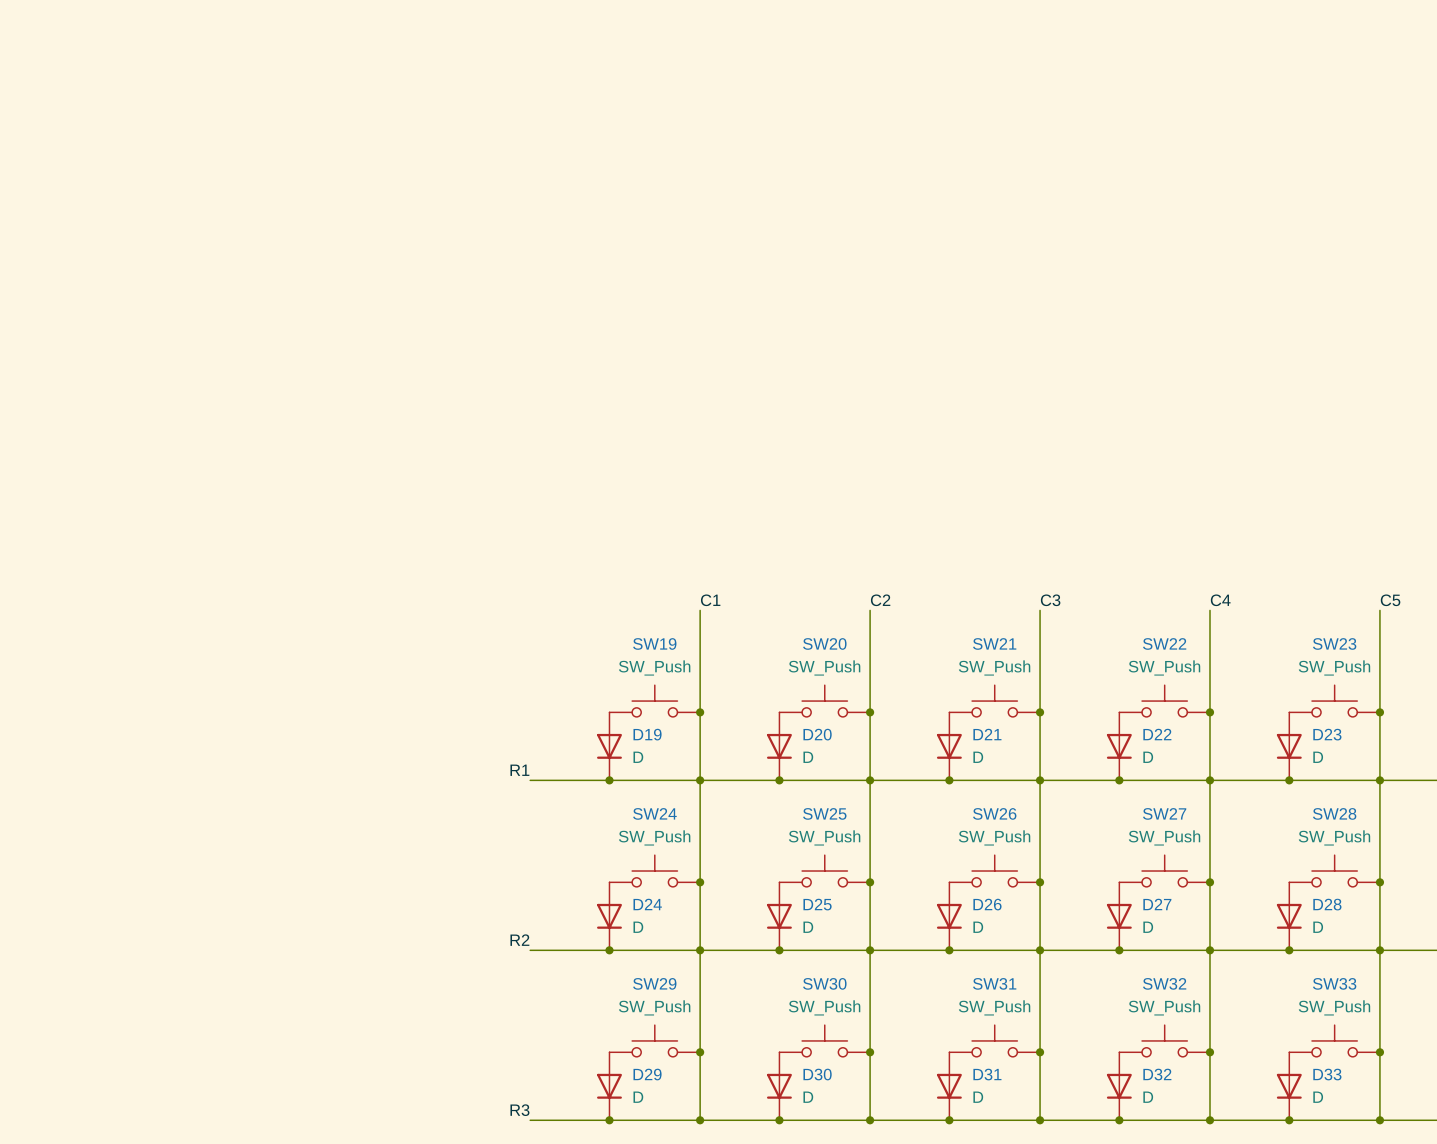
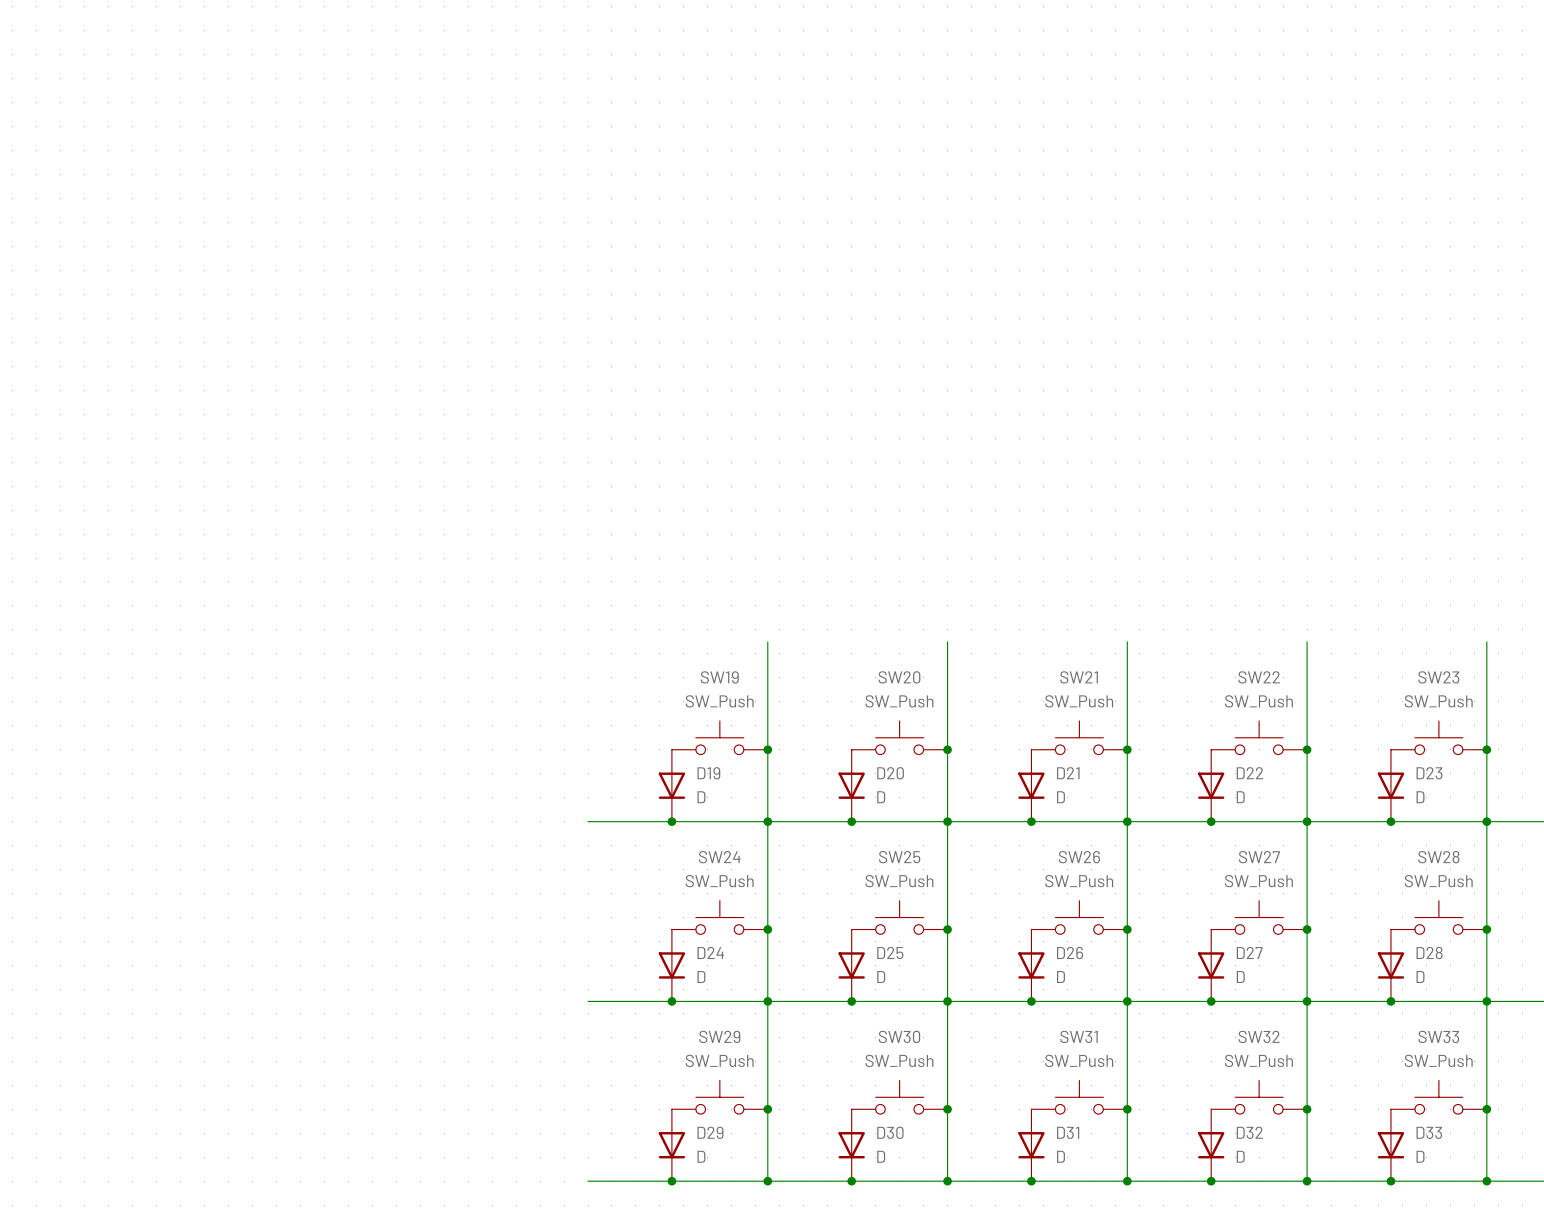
label: C1 (710, 600) -> none
label: C2 (880, 600) -> none
label: C3 (1050, 600) -> none
label: C4 (1220, 600) -> none
label: C5 (1390, 600) -> none
label: R1 (519, 770) -> none
label: R2 (519, 940) -> none
label: R3 (519, 1110) -> none

